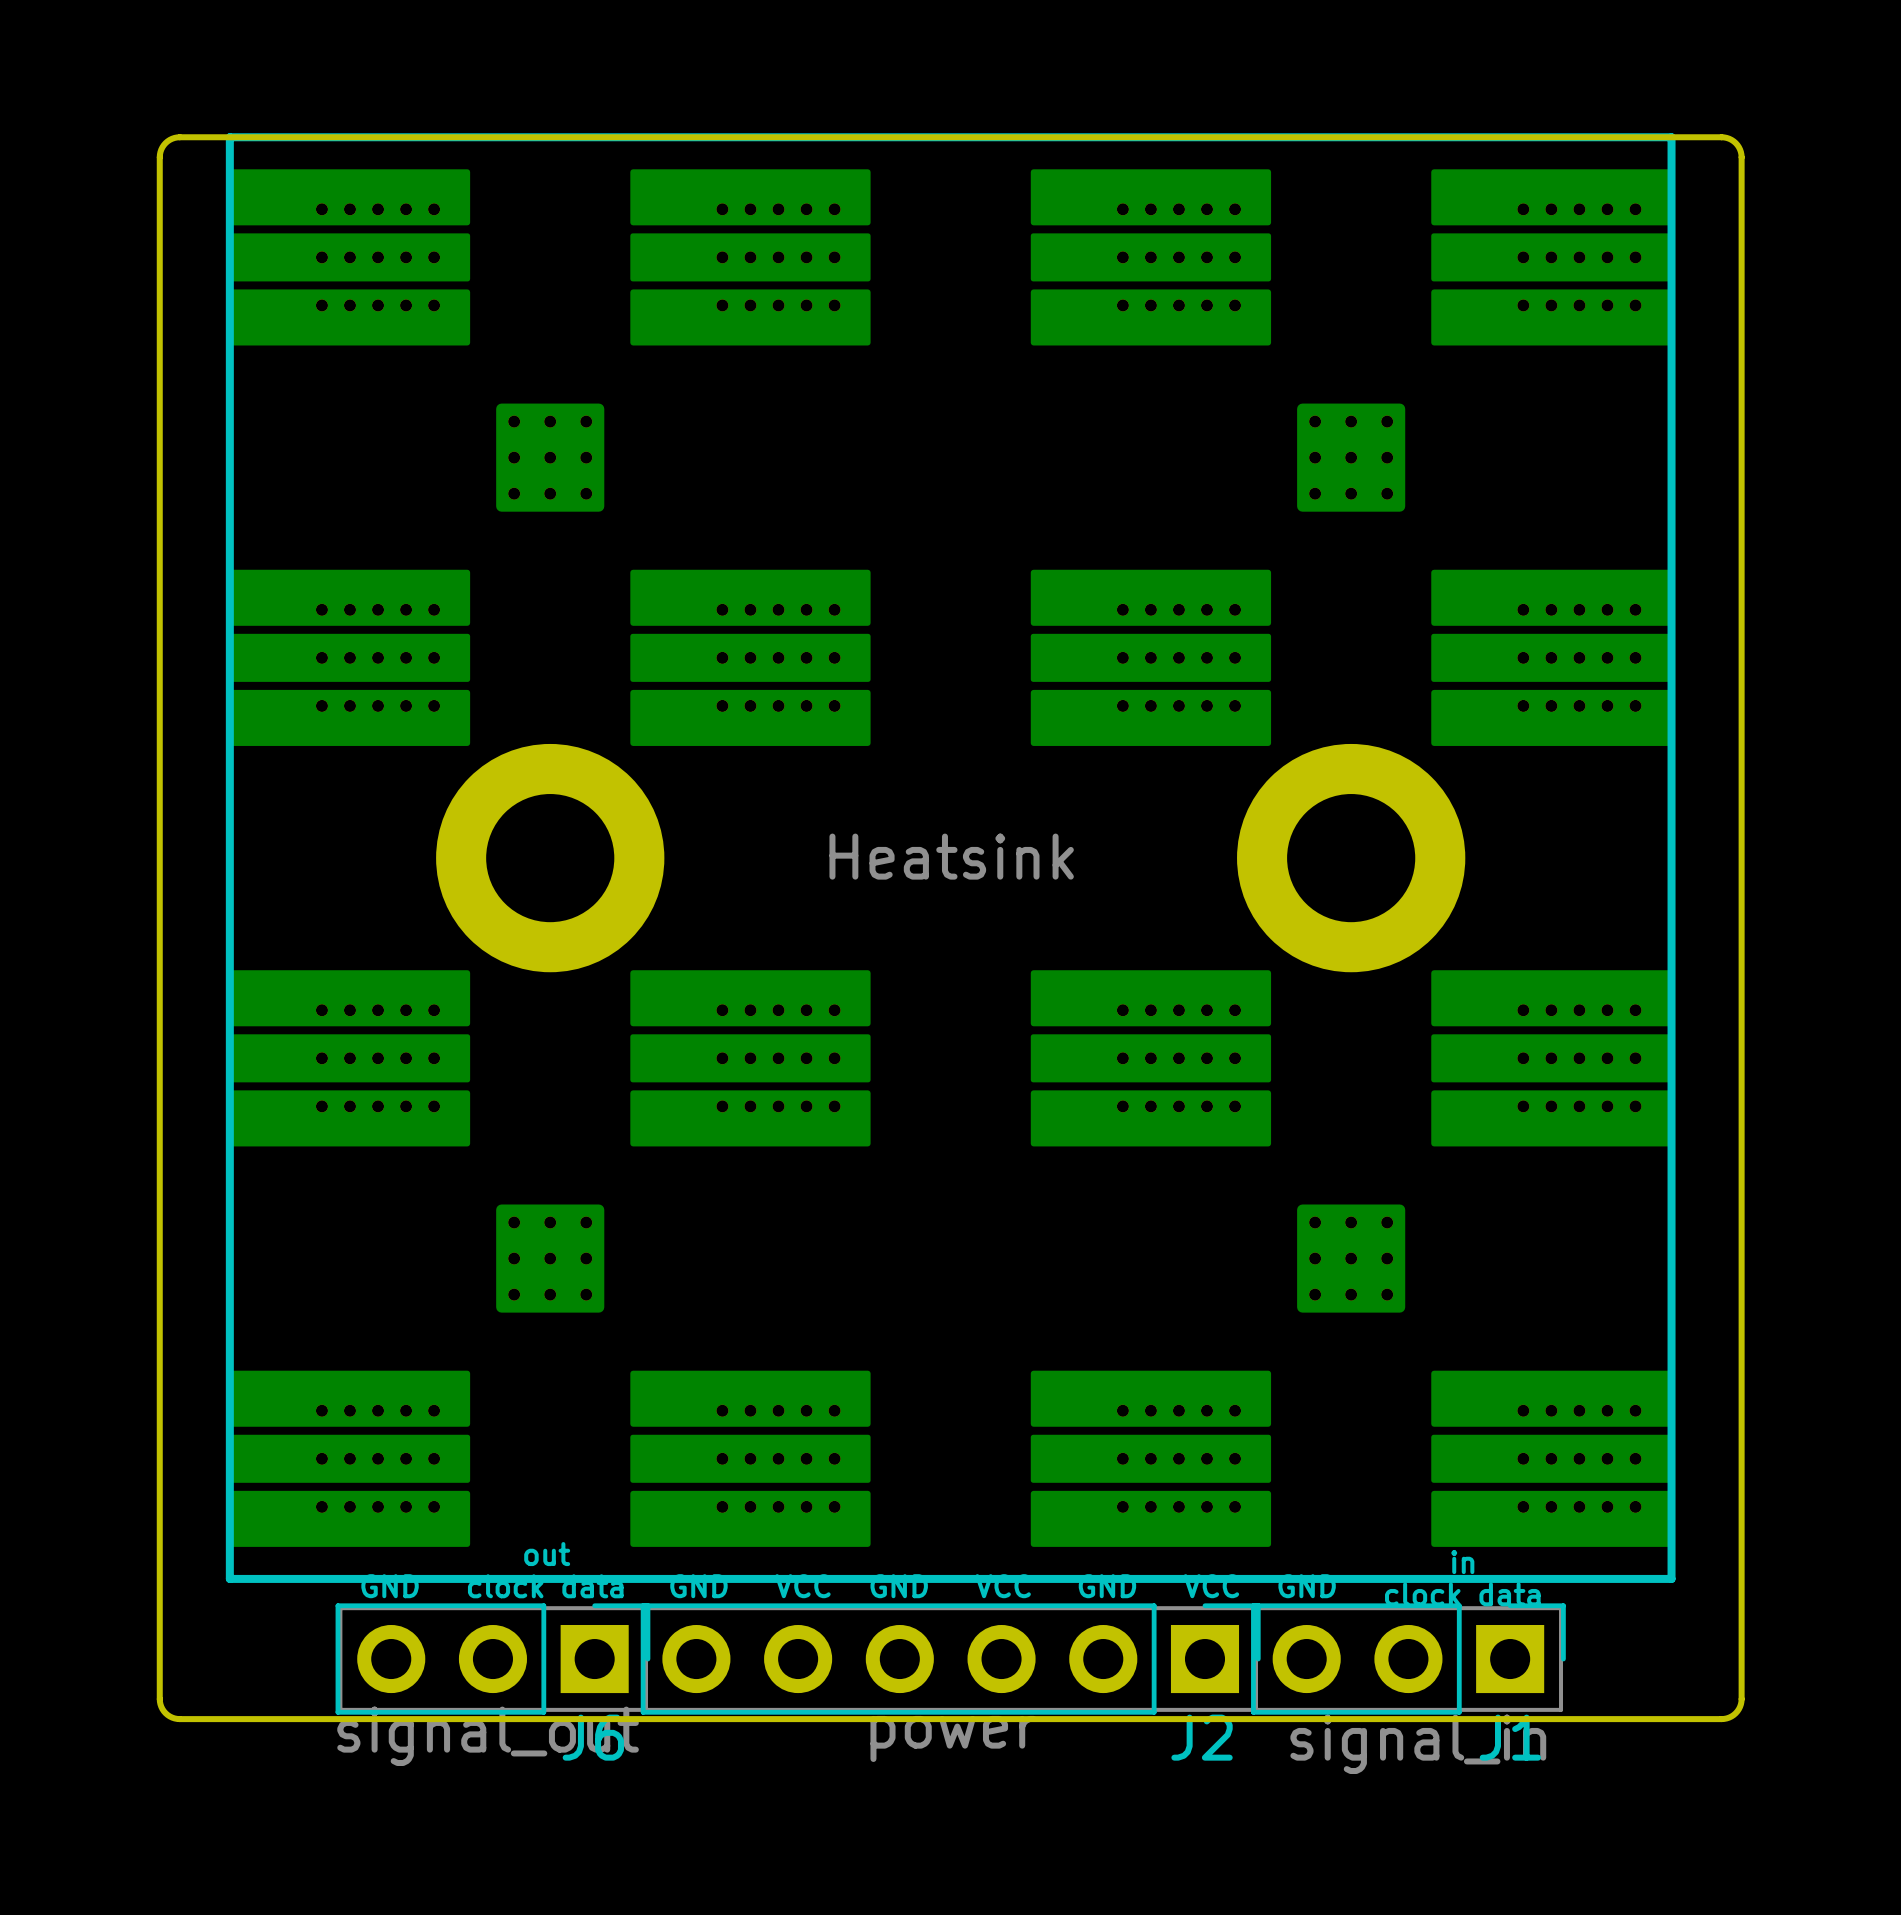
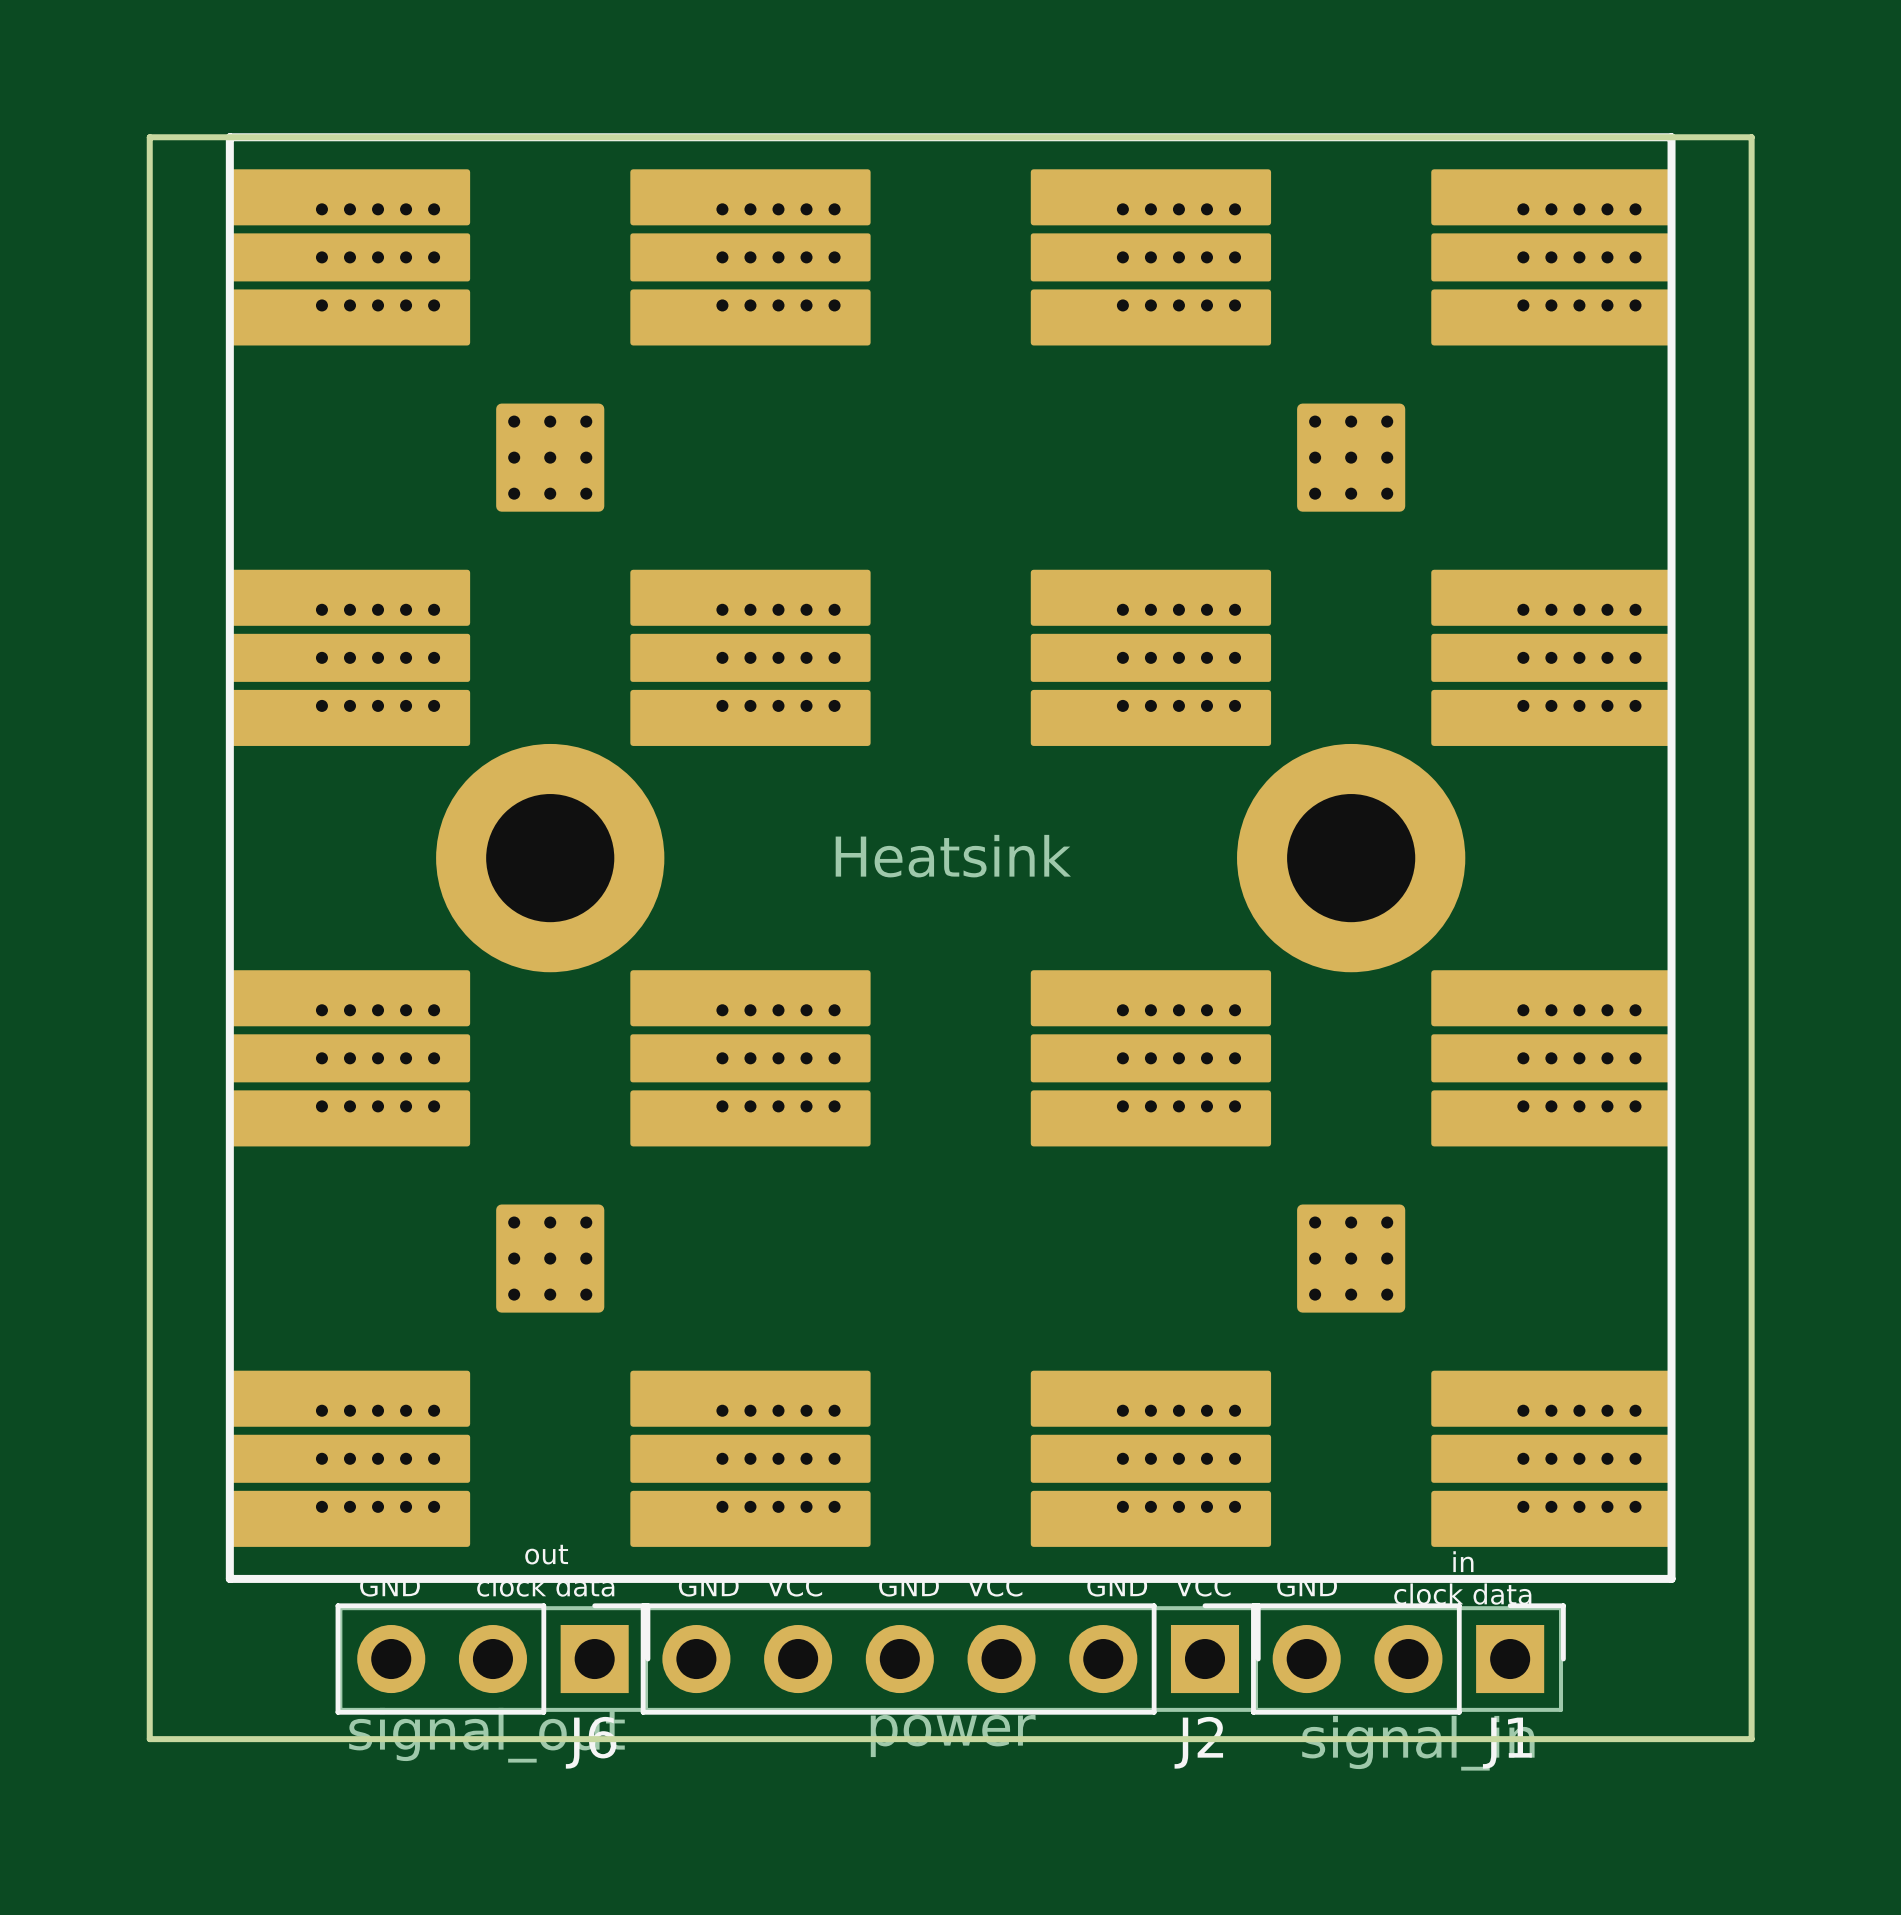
board edge: (1721, 137) (1729, 138) (1735, 143) (1740, 149) (1741, 157) (1741, 1699) (1740, 1706) (1735, 1713) (1729, 1717) (1721, 1719) (179, 1719) (172, 1717) (165, 1713) (161, 1706) (159, 1699) (159, 157) (161, 149) (165, 143) (172, 138) (179, 137) -> (1721, 137) (1751, 137) (1751, 1739) (149, 1739) (149, 137) (179, 137)

